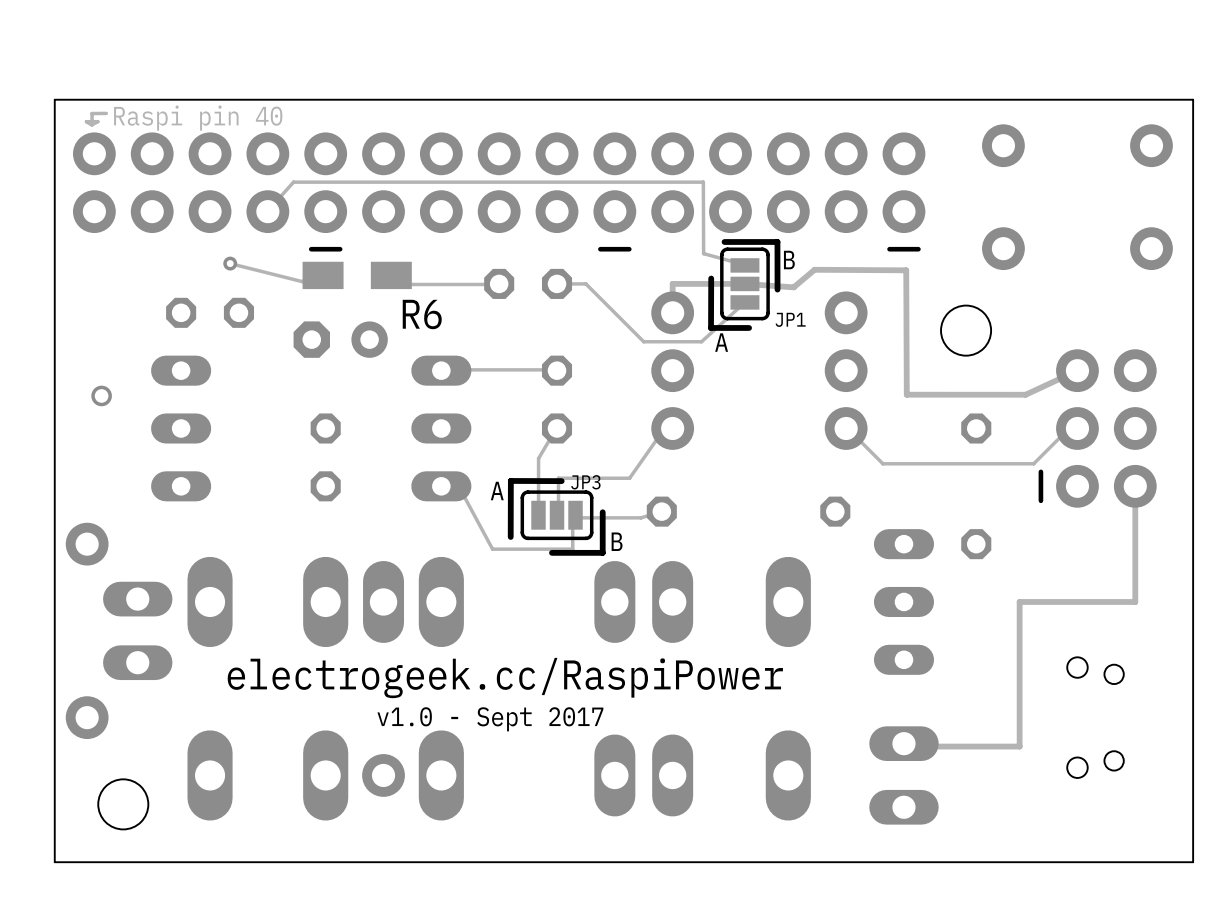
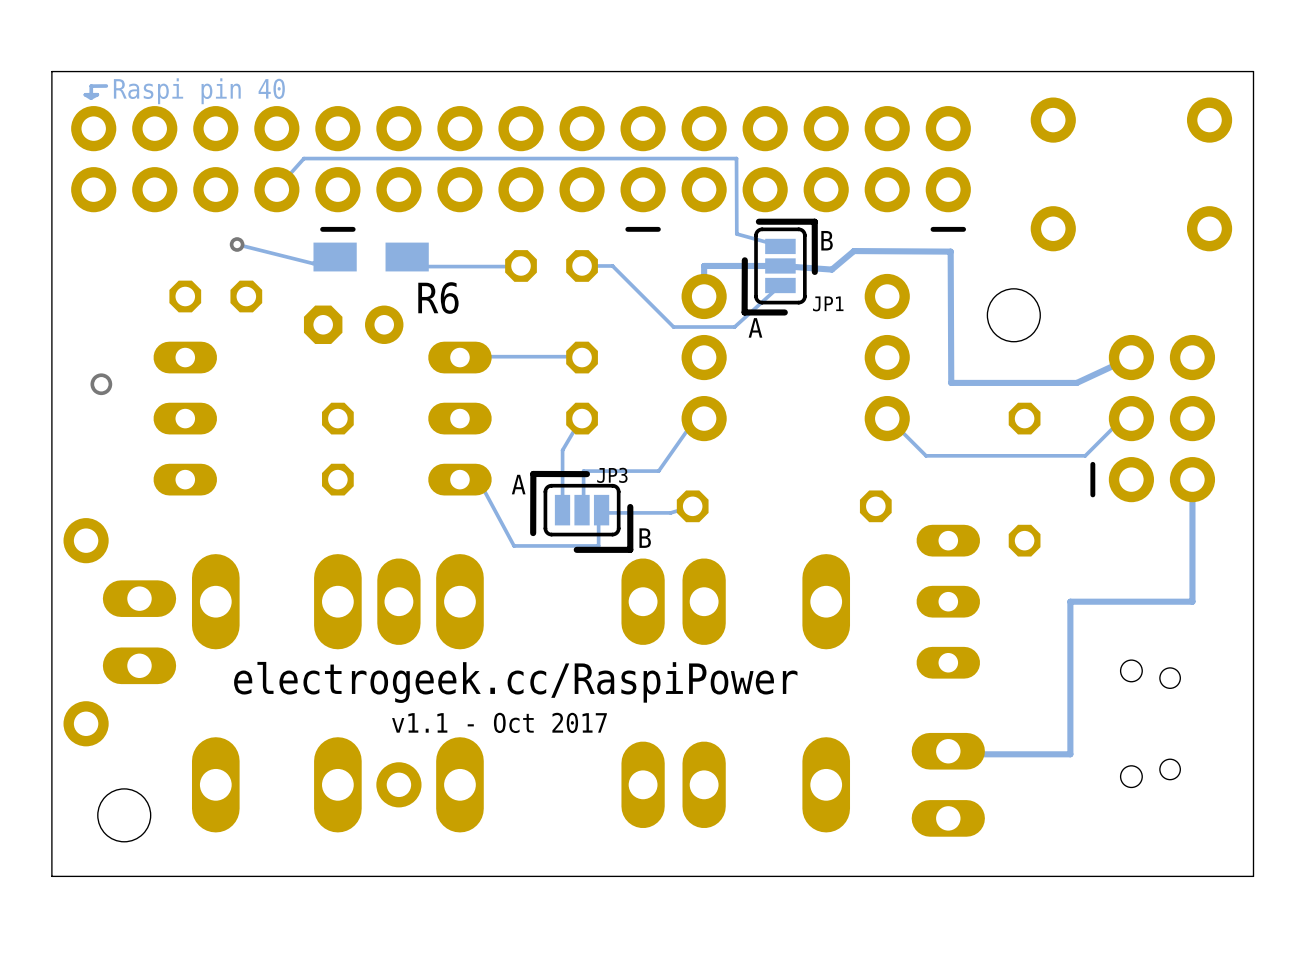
text: v1.0 - Sept 2017 (490, 719) -> v1.1 - Oct 2017 (499, 722)

